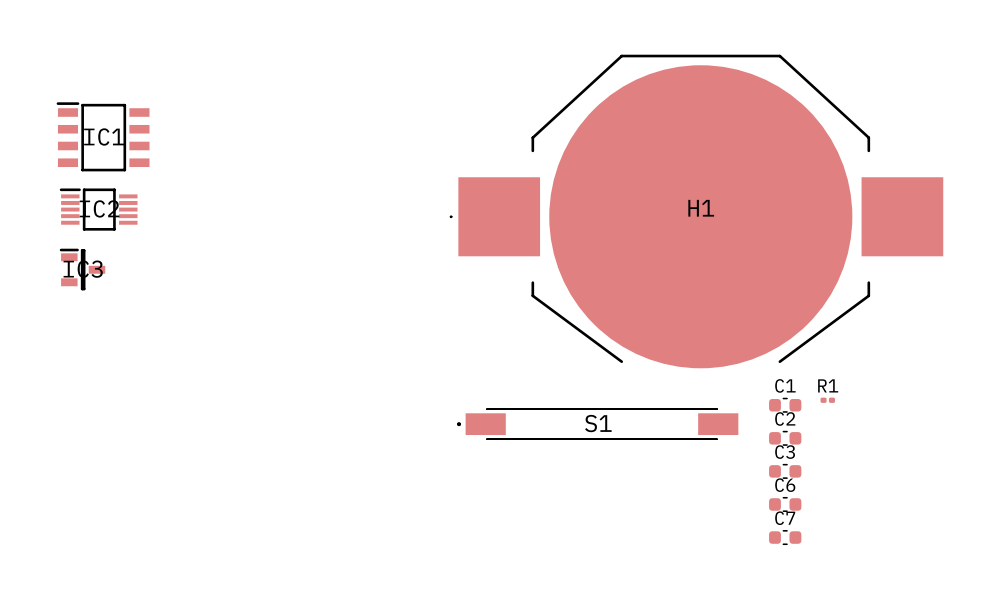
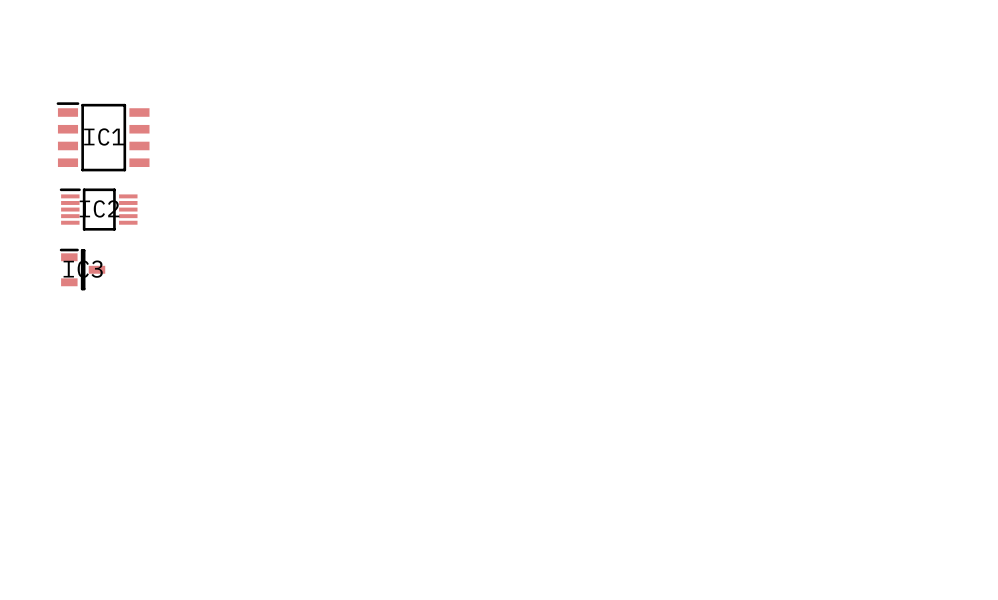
H1: (696, 211) -> none
R1: (827, 400) -> none
C1: (785, 405) -> none
S1: (597, 424) -> none
C2: (785, 438) -> none
C3: (785, 471) -> none
C6: (785, 504) -> none
C7: (785, 537) -> none

